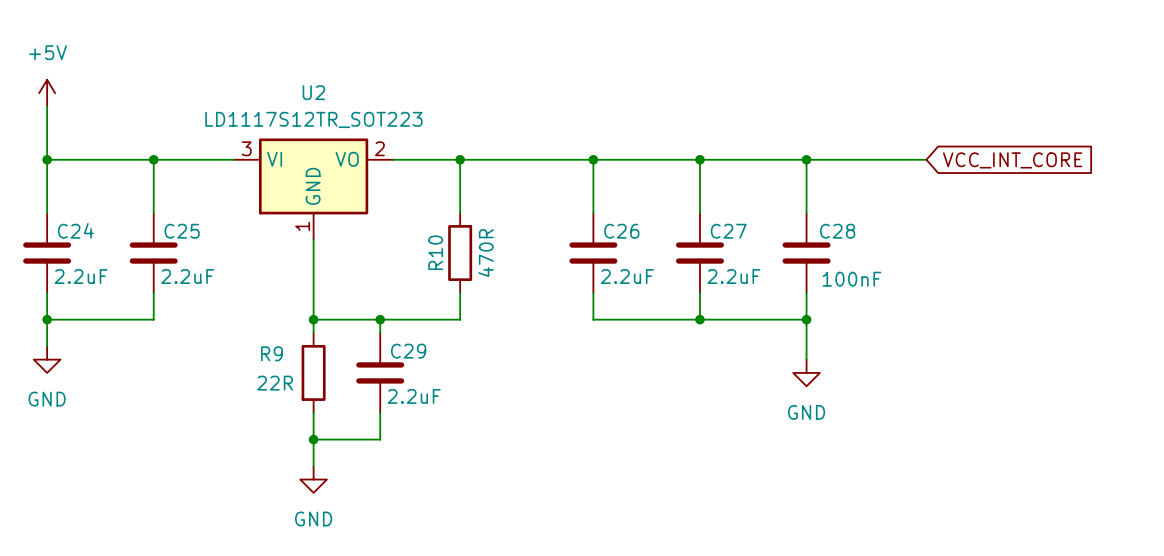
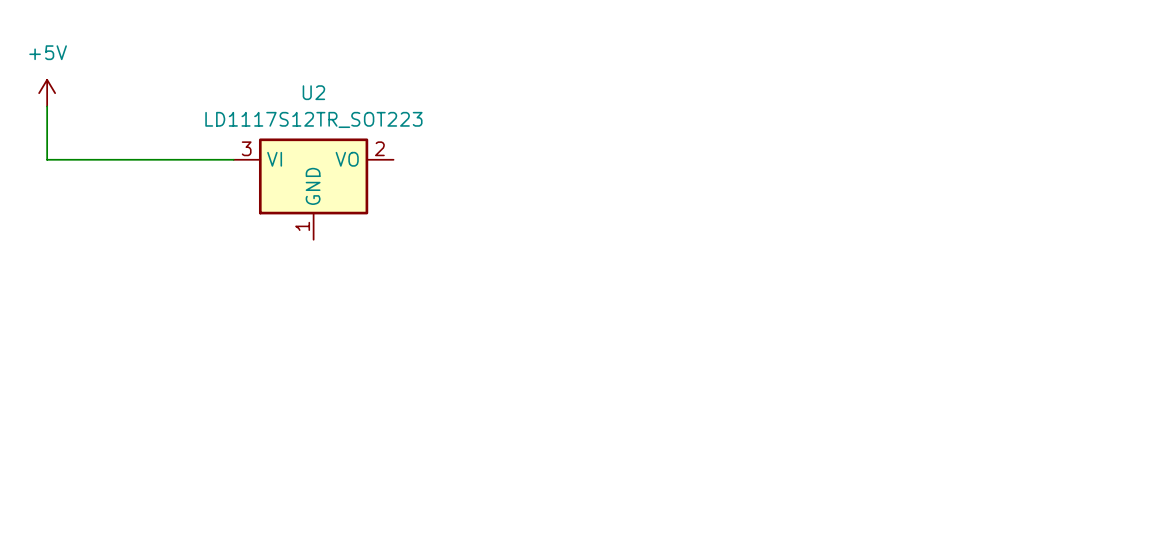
wire: (47, 159) (47, 213) -> none
junction: (47, 159) -> none
wire: (153, 159) (153, 213) -> none
junction: (153, 159) -> none
wire: (393, 159) (926, 159) -> none
wire: (460, 159) (460, 213) -> none
junction: (460, 159) -> none
wire: (593, 159) (593, 213) -> none
junction: (593, 159) -> none
wire: (699, 159) (699, 213) -> none
junction: (699, 159) -> none
wire: (806, 159) (806, 213) -> none
junction: (806, 159) -> none
global label: VCC_INT_CORE (1012, 160) -> none
wire: (313, 239) (313, 332) -> none
C24: 2.2uF (47, 253) -> none
C25: 2.2uF (153, 253) -> none
R10: 470R (460, 253) -> none
C26: 2.2uF (593, 253) -> none
C27: 2.2uF (699, 253) -> none
C28: 100nF (806, 253) -> none
wire: (47, 293) (47, 346) -> none
wire: (153, 293) (153, 319) (47, 319) -> none
wire: (460, 293) (460, 319) (313, 319) -> none
wire: (593, 293) (593, 319) (806, 319) -> none
wire: (699, 293) (699, 319) -> none
wire: (806, 293) (806, 359) -> none
junction: (47, 319) -> none
junction: (313, 319) -> none
wire: (380, 319) (380, 332) -> none
junction: (380, 319) -> none
junction: (699, 319) -> none
junction: (806, 319) -> none
power symbol: GND (47, 359) -> none
R9: 22R (313, 372) -> none
C29: 2.2uF (380, 372) -> none
power symbol: GND (806, 372) -> none
wire: (313, 412) (313, 466) -> none
wire: (380, 412) (380, 439) (313, 439) -> none
junction: (313, 439) -> none
power symbol: GND (313, 479) -> none

